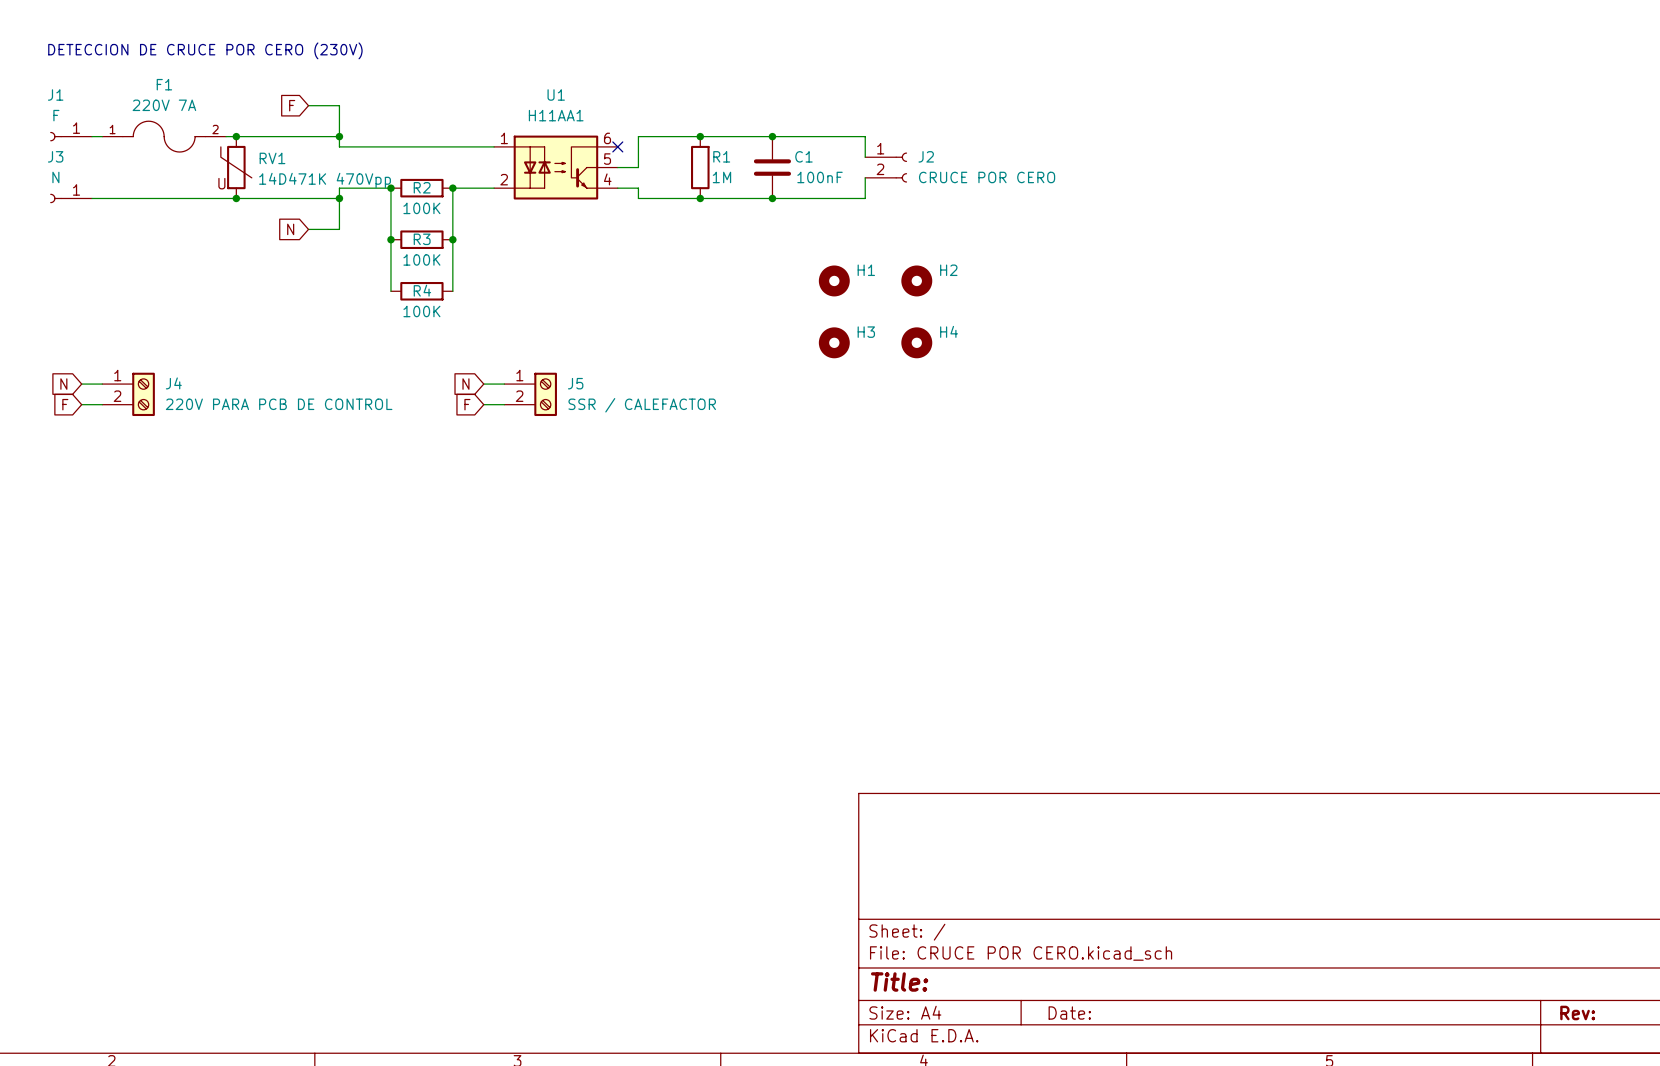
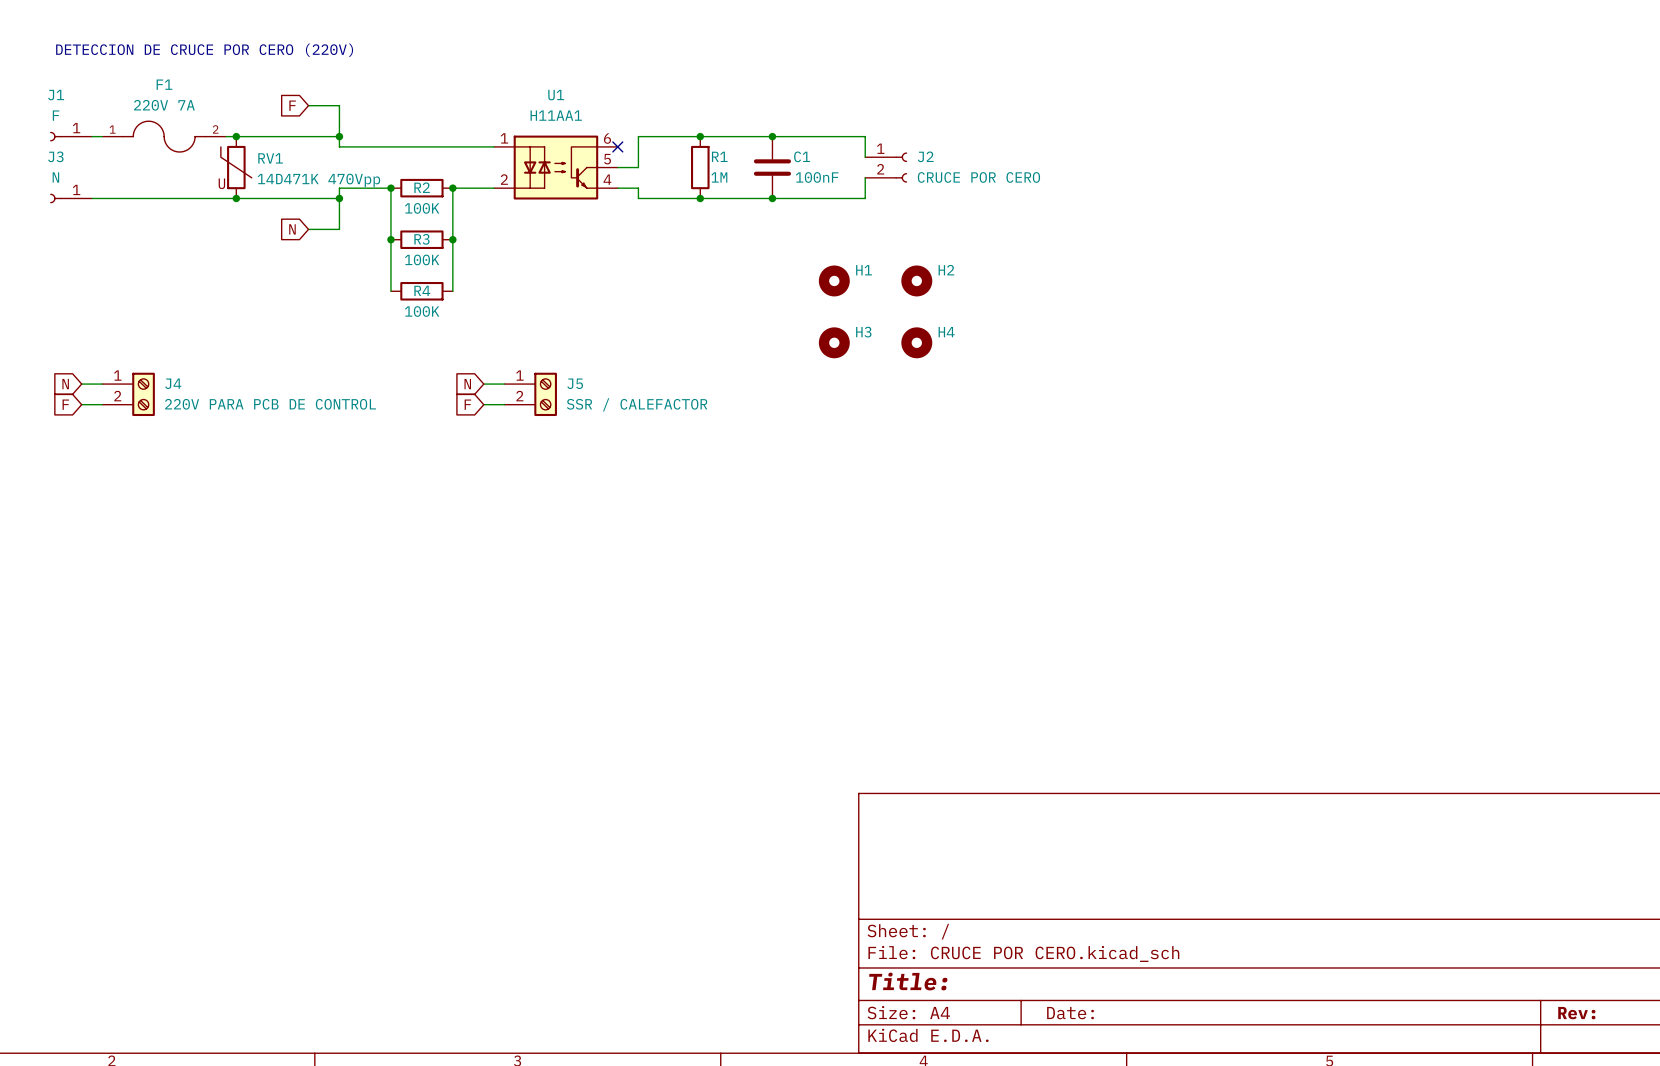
text: DETECCION DE CRUCE POR CERO (230V) (205, 50) -> DETECCION DE CRUCE POR CERO (220V) (204, 50)

